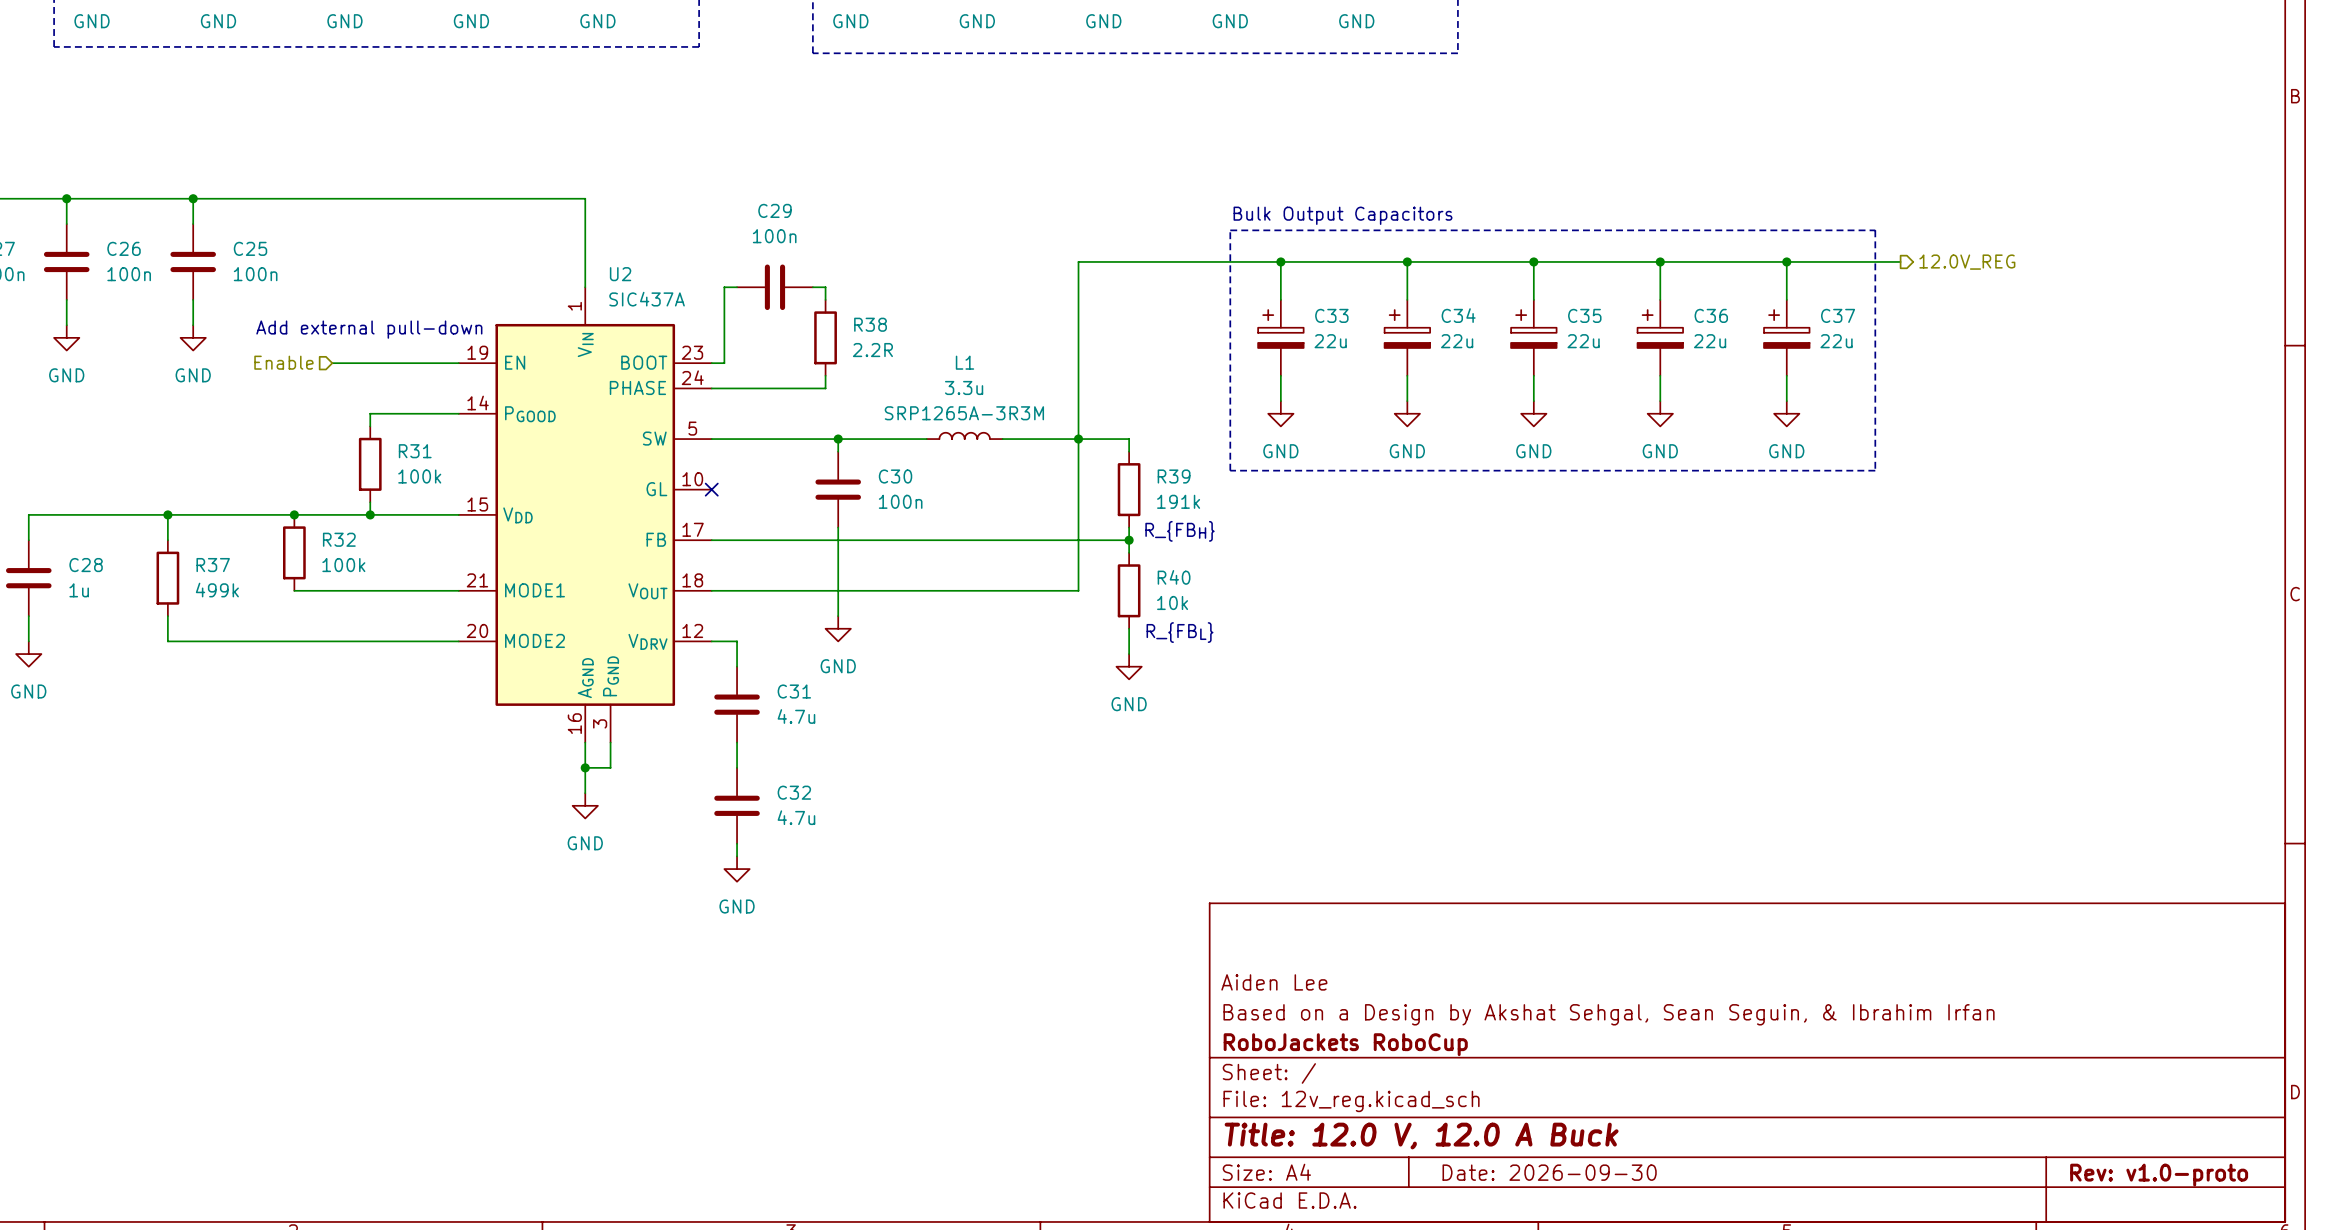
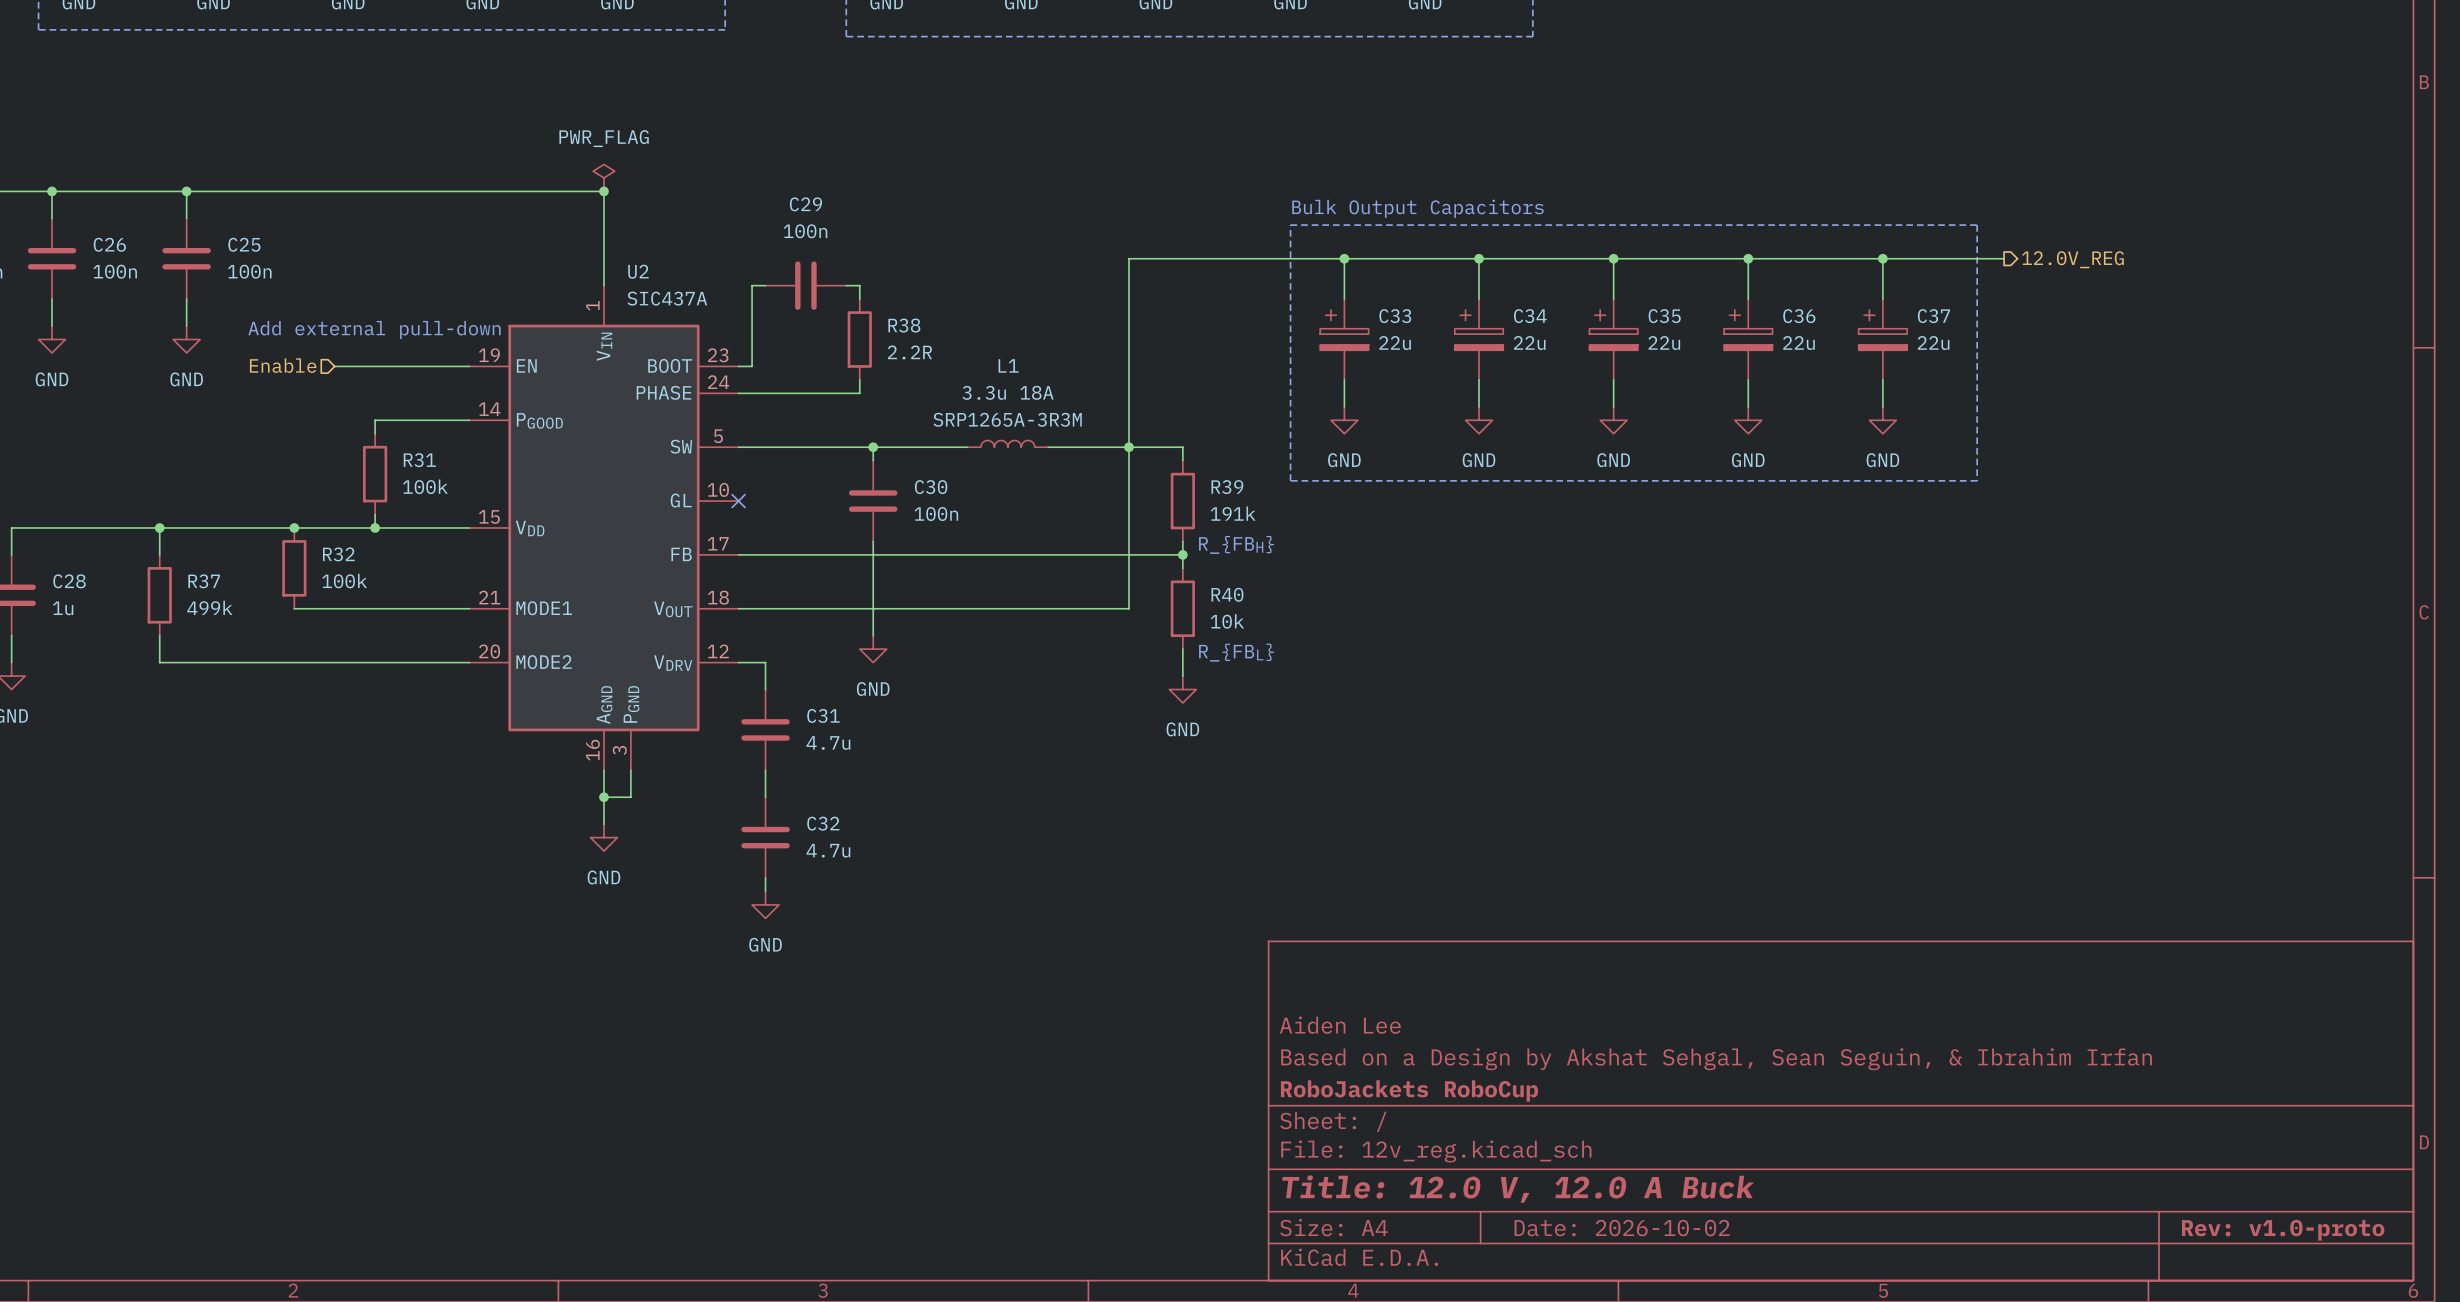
power symbol: none -> PWR_FLAG (603, 177)
junction: none -> (603, 191)
L1 value: 3.3u (964, 387) -> 3.3u 18A (1008, 392)
title block: Date: 2026-09-30 (1549, 1172) -> Date: 2026-10-02 (1622, 1228)

